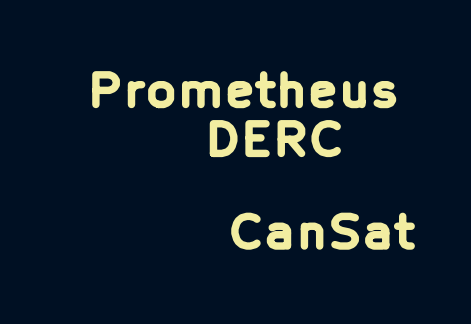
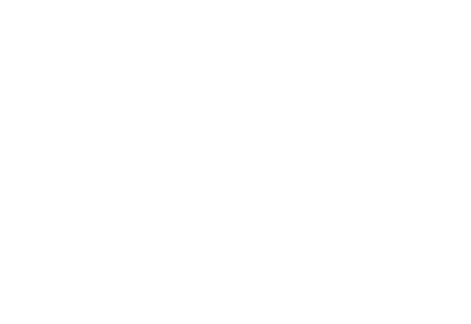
text: Prometheus (244, 89) -> none
text: DERC (275, 138) -> none
text: CanSat (323, 231) -> none

